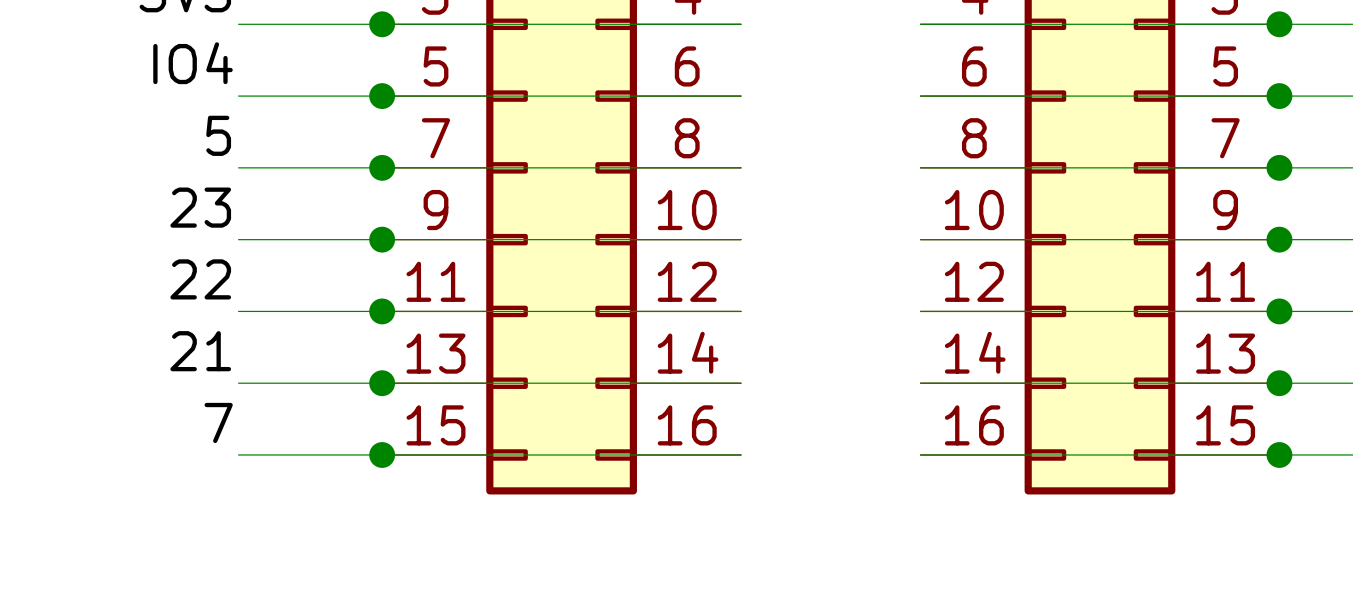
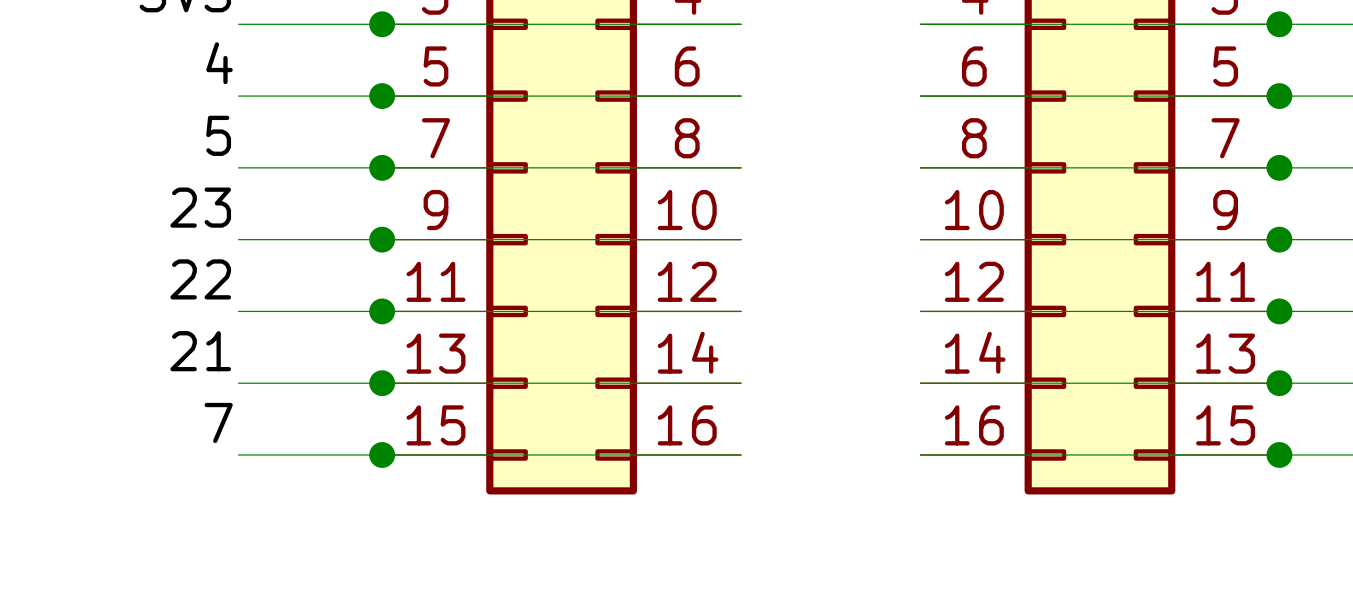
label: IO4 (193, 63) -> 4 (219, 63)

